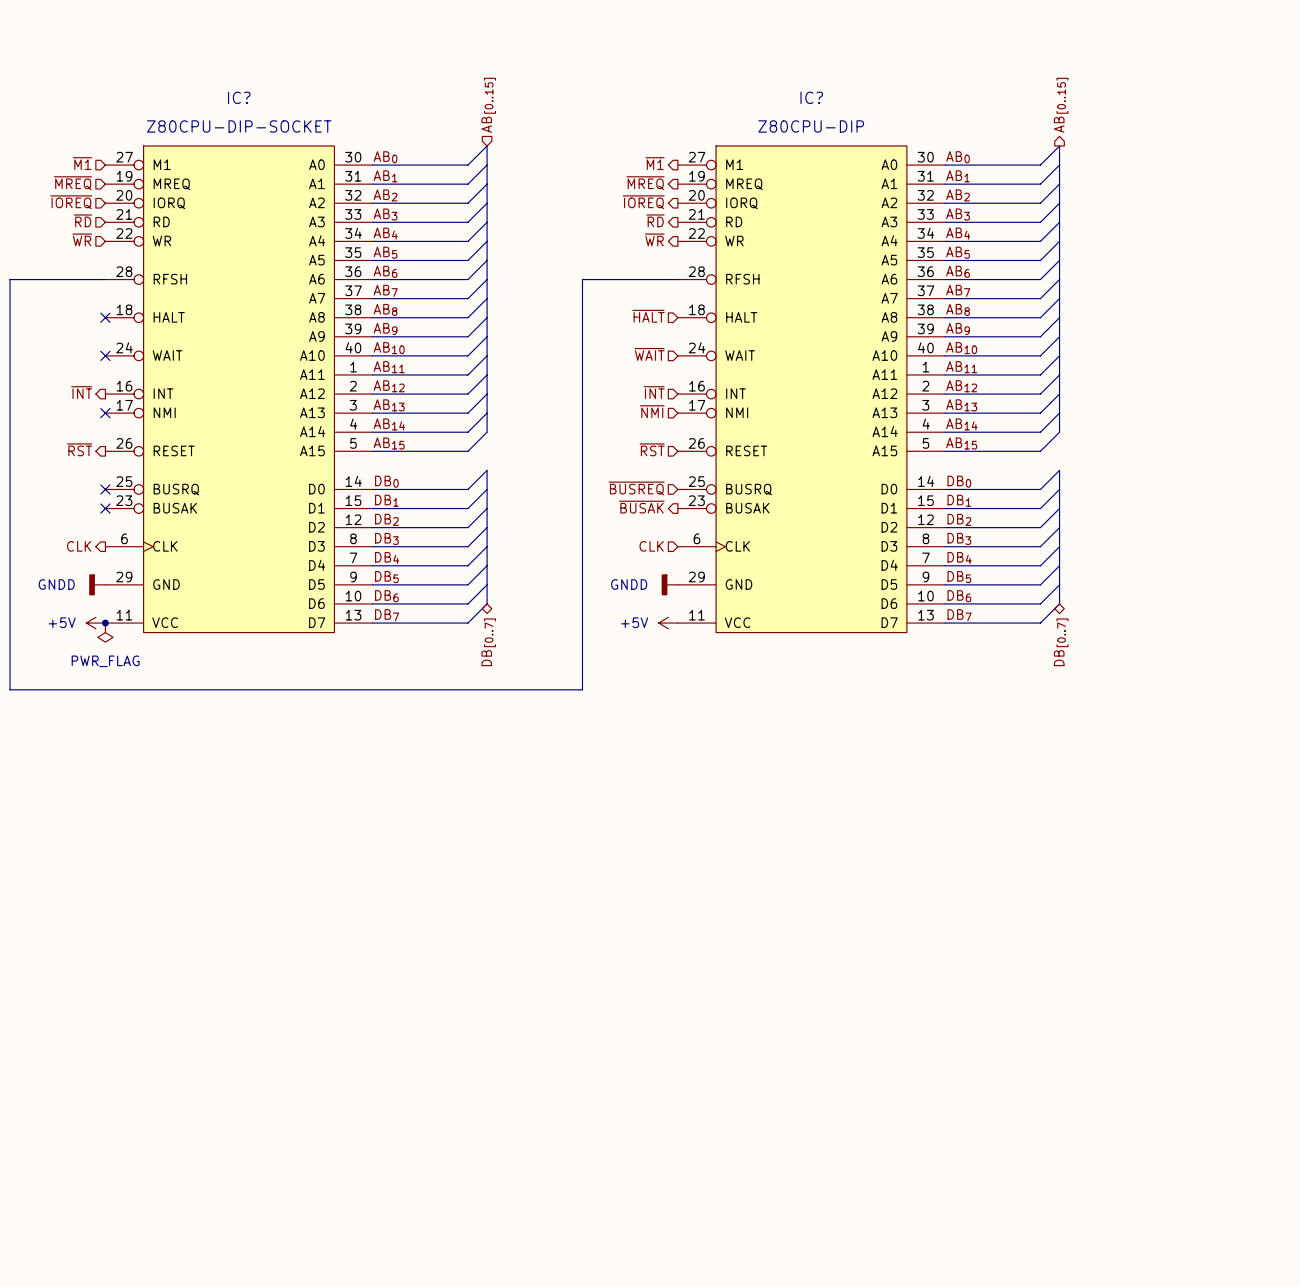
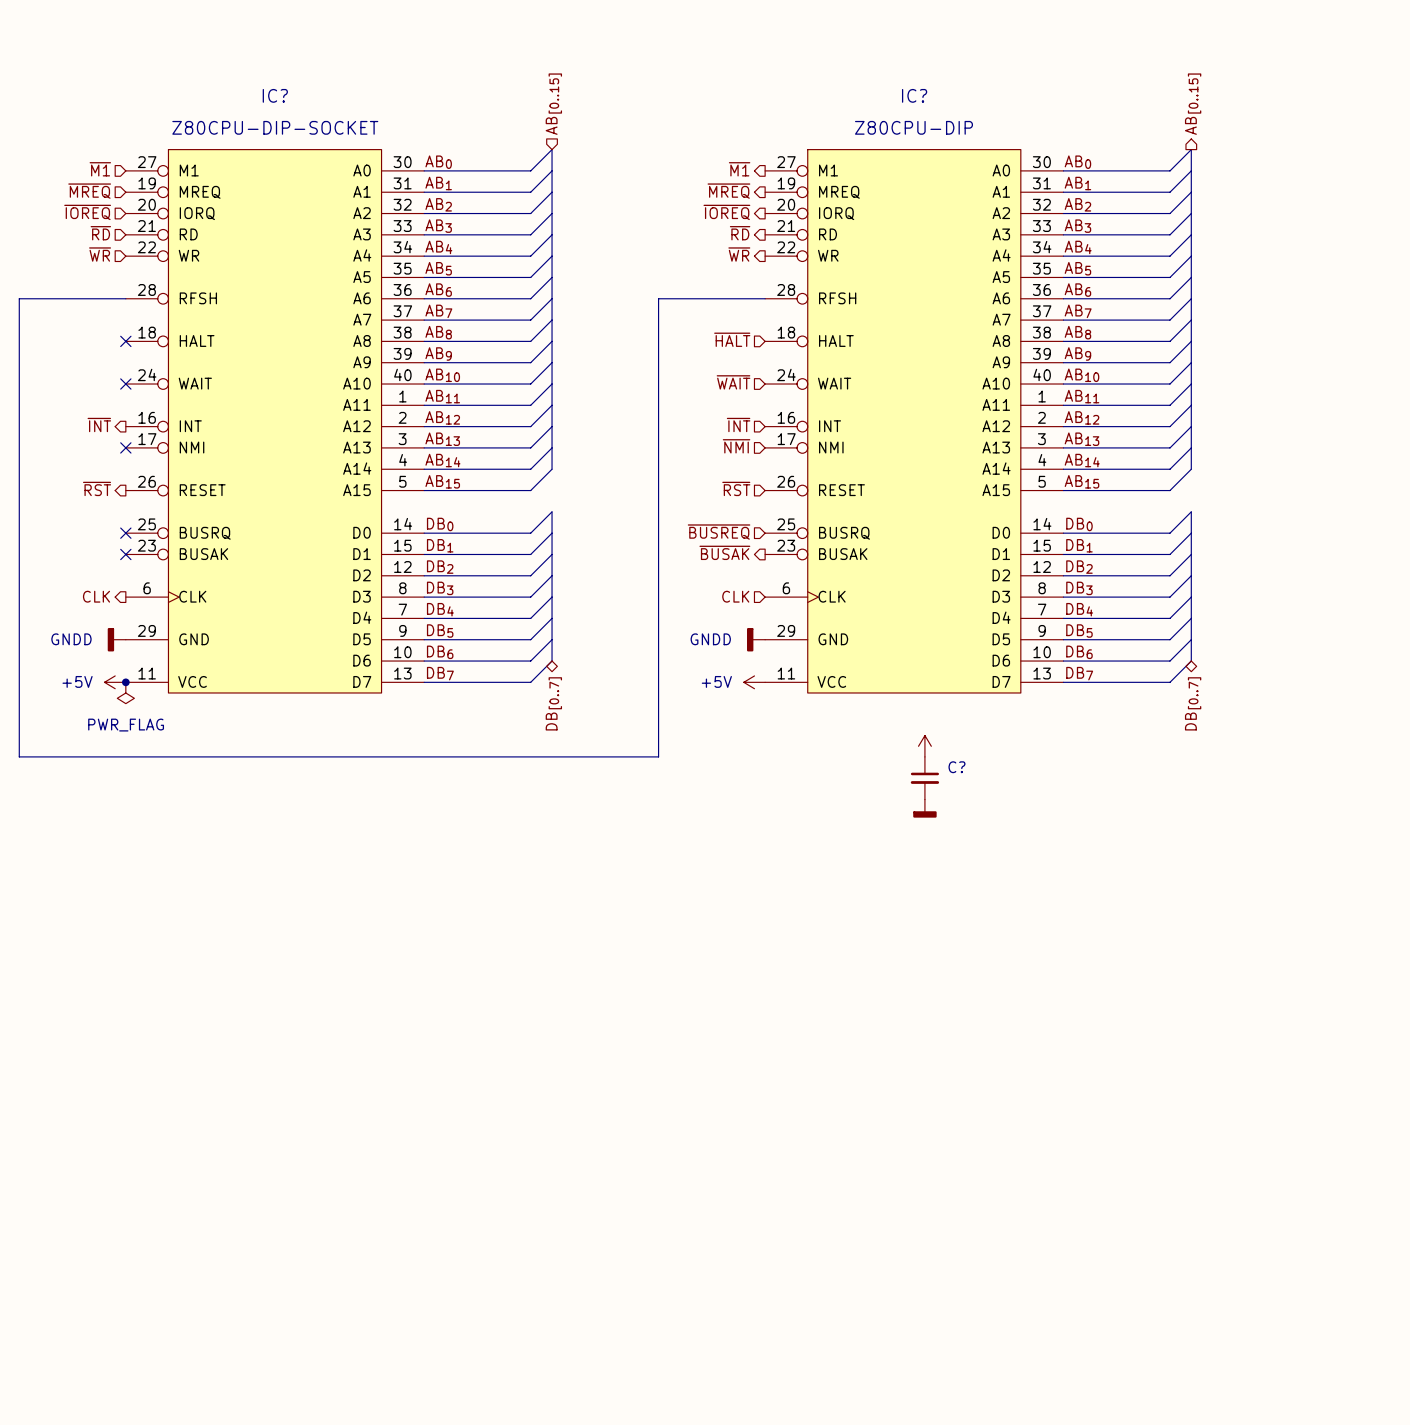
power symbol: none -> (924, 746)
C?: none -> (924, 778)
power symbol: none -> (924, 808)

